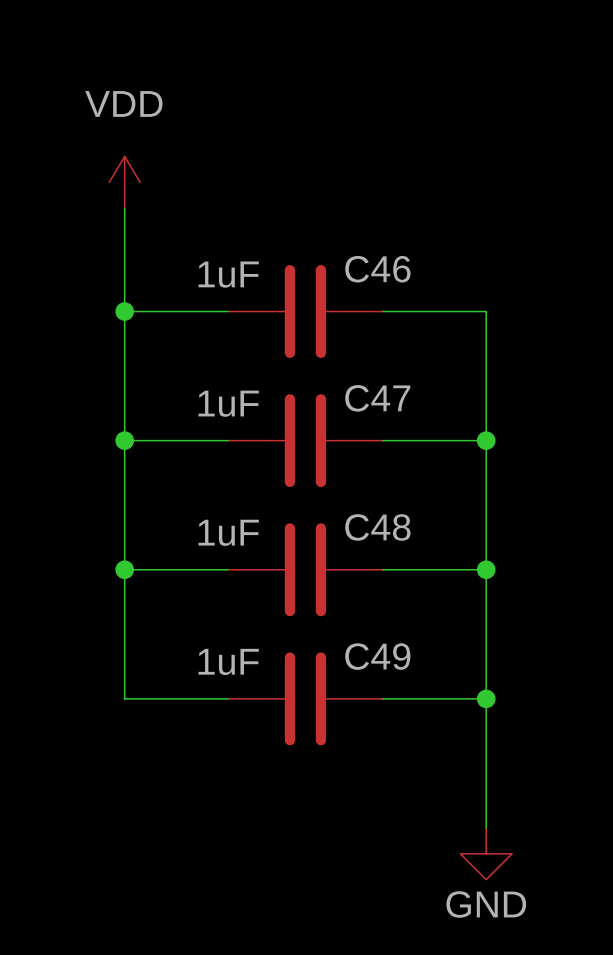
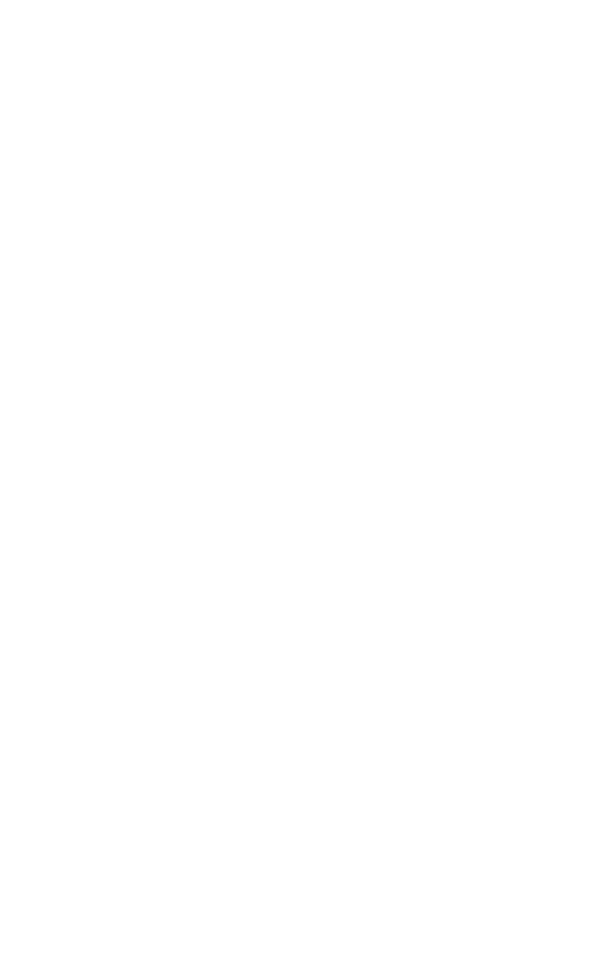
power symbol: VDD (124, 182) -> none
wire: (124, 208) (124, 698) (227, 698) -> none
wire: (124, 311) (227, 311) -> none
junction: (124, 311) -> none
C46: 1uF (305, 311) -> none
wire: (382, 311) (486, 311) (486, 827) -> none
wire: (124, 440) (227, 440) -> none
junction: (124, 440) -> none
C47: 1uF (305, 440) -> none
wire: (382, 440) (486, 440) -> none
junction: (486, 440) -> none
wire: (124, 569) (227, 569) -> none
junction: (124, 569) -> none
C48: 1uF (305, 569) -> none
wire: (382, 569) (486, 569) -> none
junction: (486, 569) -> none
C49: 1uF (305, 698) -> none
wire: (382, 698) (486, 698) -> none
junction: (486, 698) -> none
power symbol: GND (486, 853) -> none

